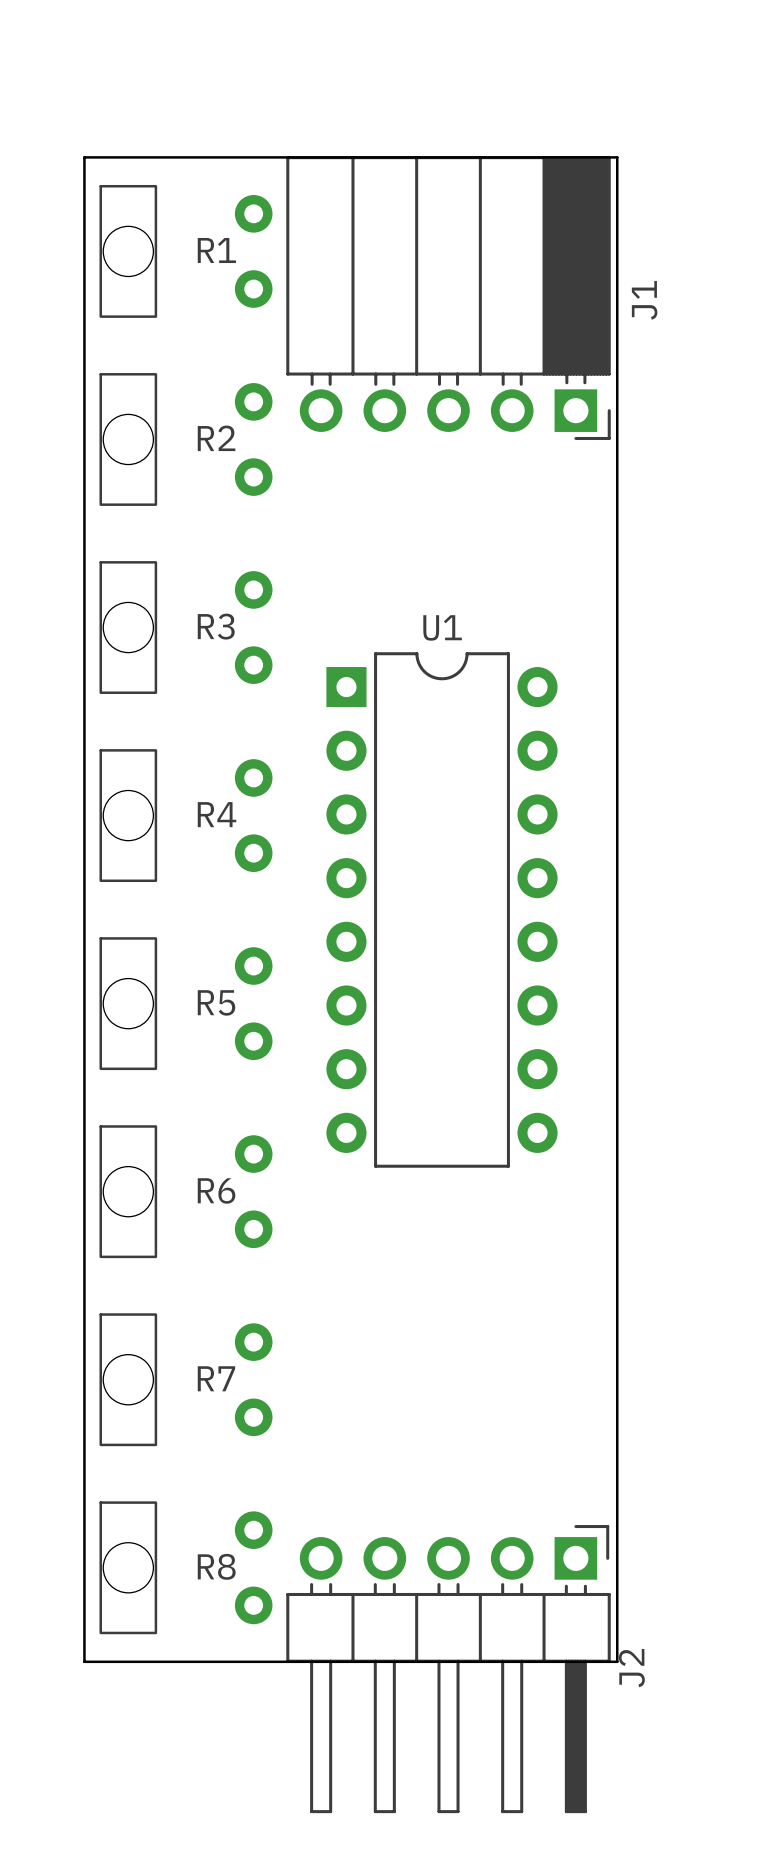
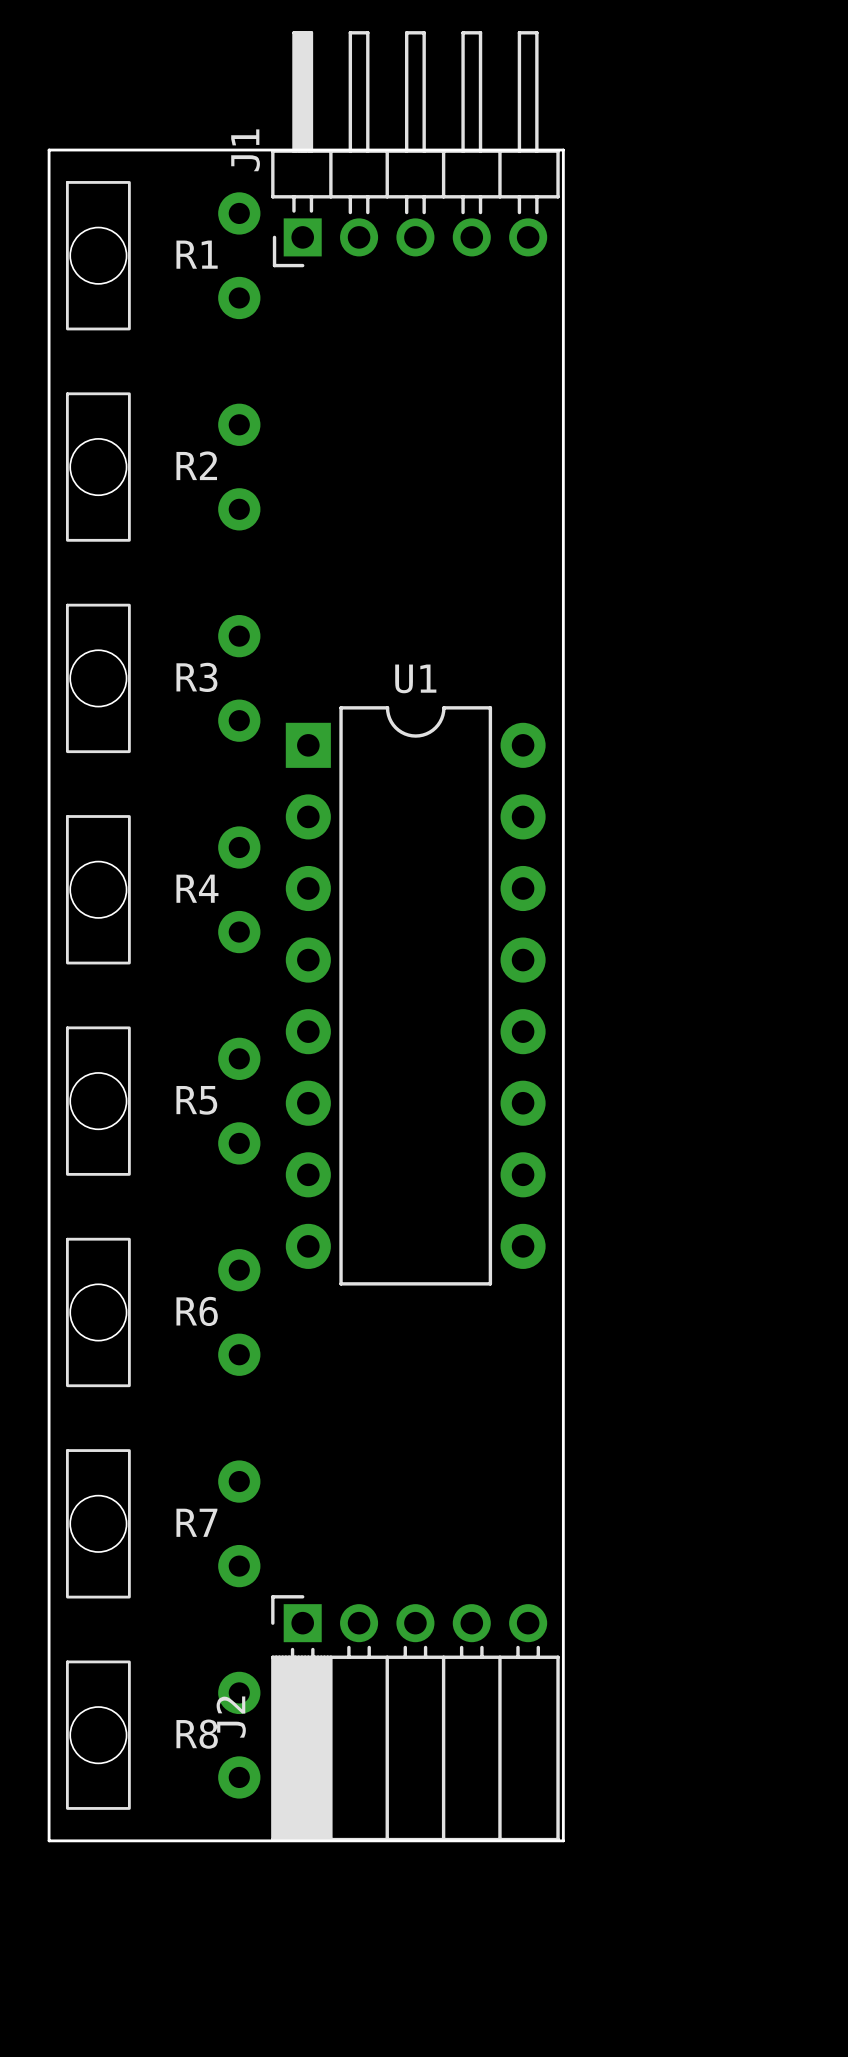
J1 footprint: [286, 156, 611, 440] -> [271, 31, 560, 268]
board edge: (542, 157) (617, 157) (617, 1661) (542, 1661) -> (563, 150) (563, 1840)
J1 name position: J1 (644, 300) -> J1 (245, 150)
U1 position: (441, 909) -> (415, 995)
J2 footprint: [286, 1525, 611, 1814] -> [271, 1595, 560, 1842]
J2 name position: J2 (631, 1668) -> J2 (231, 1717)

